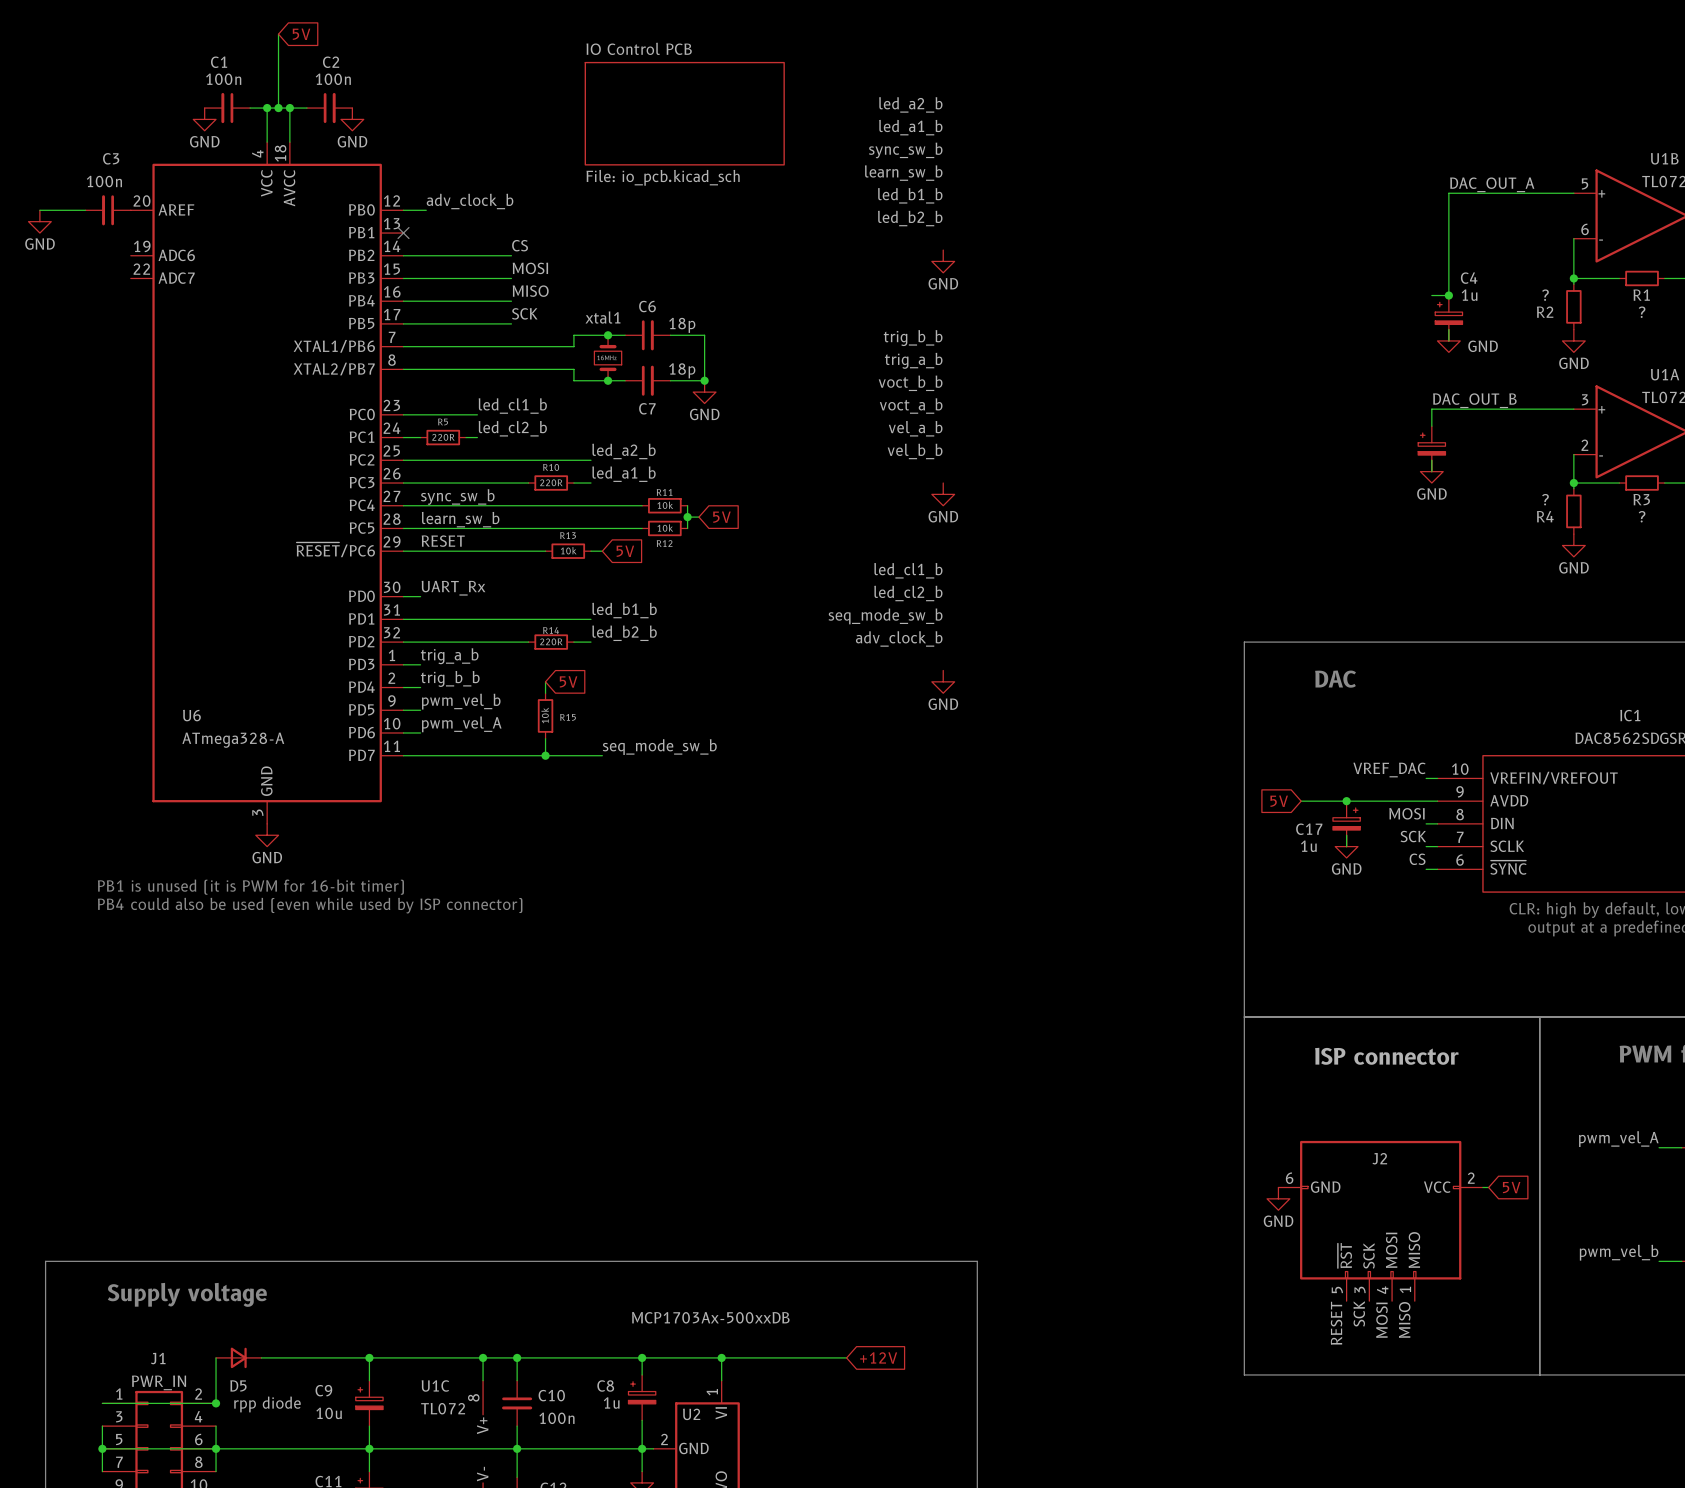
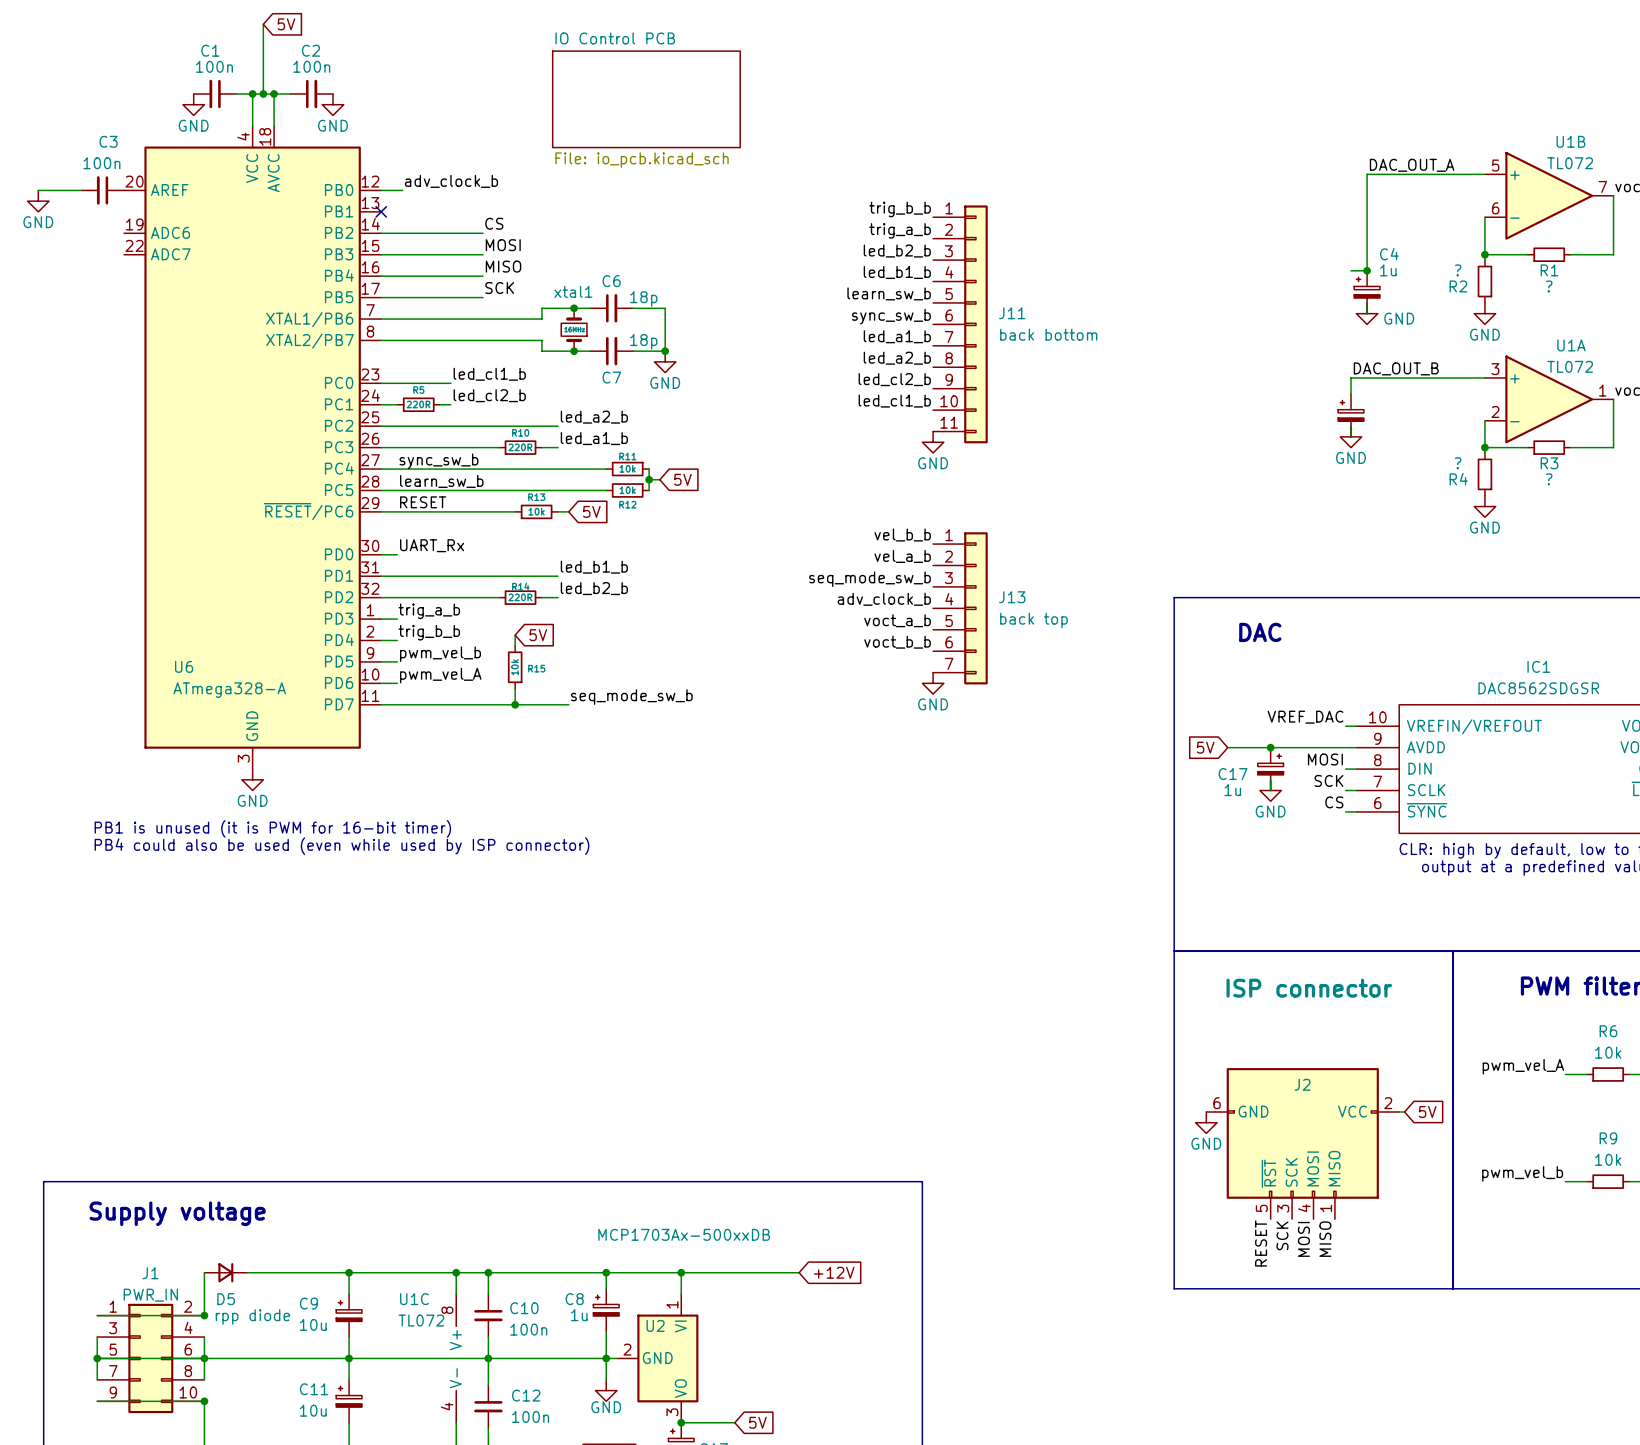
label: led_a2_b (910, 104) -> none
label: led_a1_b (910, 127) -> none
label position: sync_sw_b (905, 150) -> sync_sw_b (891, 316)
label position: learn_sw_b (903, 173) -> learn_sw_b (889, 293)
label position: led_b1_b (910, 195) -> led_b1_b (897, 272)
label position: led_b2_b (910, 218) -> led_b2_b (897, 251)
power symbol: GND (943, 261) -> none
label position: trig_b_b (913, 338) -> trig_b_b (900, 209)
J11: none -> back bottom (960, 324)
label position: trig_a_b (913, 360) -> trig_a_b (900, 230)
label: none -> led_a1_b (897, 336)
label: voct_b_b (910, 383) -> none
label: none -> led_a2_b (897, 358)
label: voct_a_b (911, 406) -> none
label position: vel_a_b (915, 428) -> vel_a_b (902, 556)
label position: vel_b_b (915, 451) -> vel_b_b (902, 535)
power symbol position: GND (943, 494) -> GND (933, 442)
label position: led_cl1_b (908, 570) -> led_cl1_b (894, 401)
label position: led_cl2_b (908, 593) -> led_cl2_b (894, 379)
label position: seq_mode_sw_b (885, 616) -> seq_mode_sw_b (869, 579)
label position: adv_clock_b (899, 638) -> adv_clock_b (884, 599)
J13: none -> back top (960, 608)
label: none -> voct_a_b (897, 620)
power symbol position: GND (943, 681) -> GND (933, 683)
label: none -> voct_b_b (897, 642)

